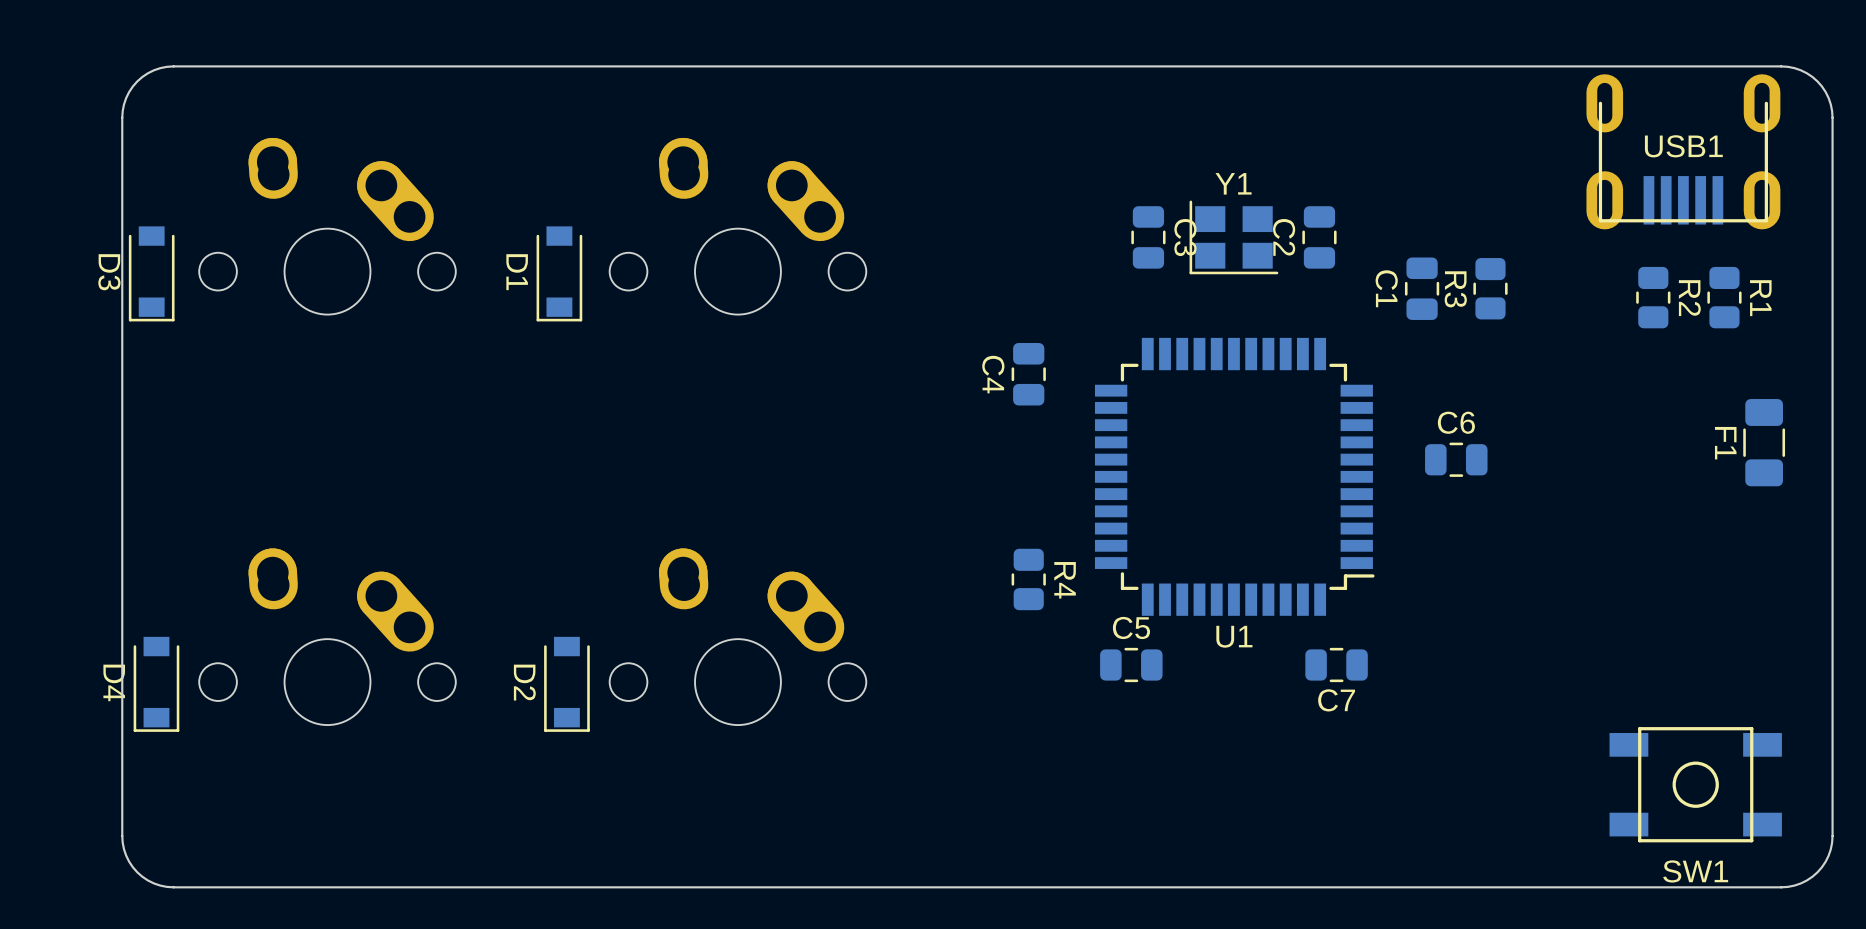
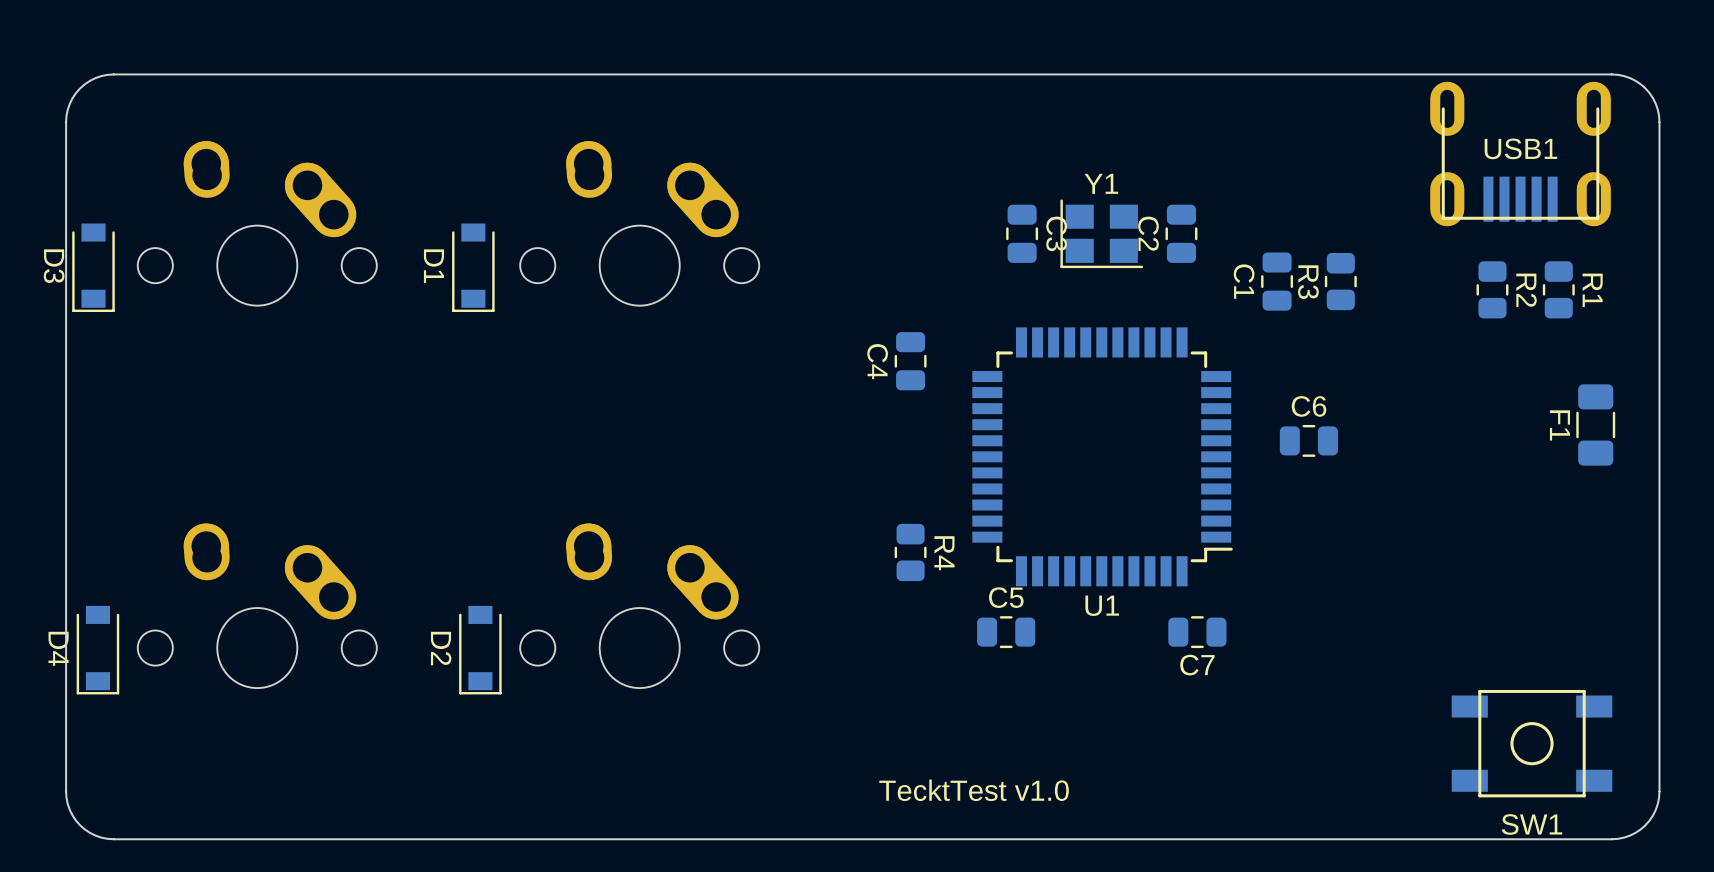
text: none -> TecktTest v1.0 (974, 790)

